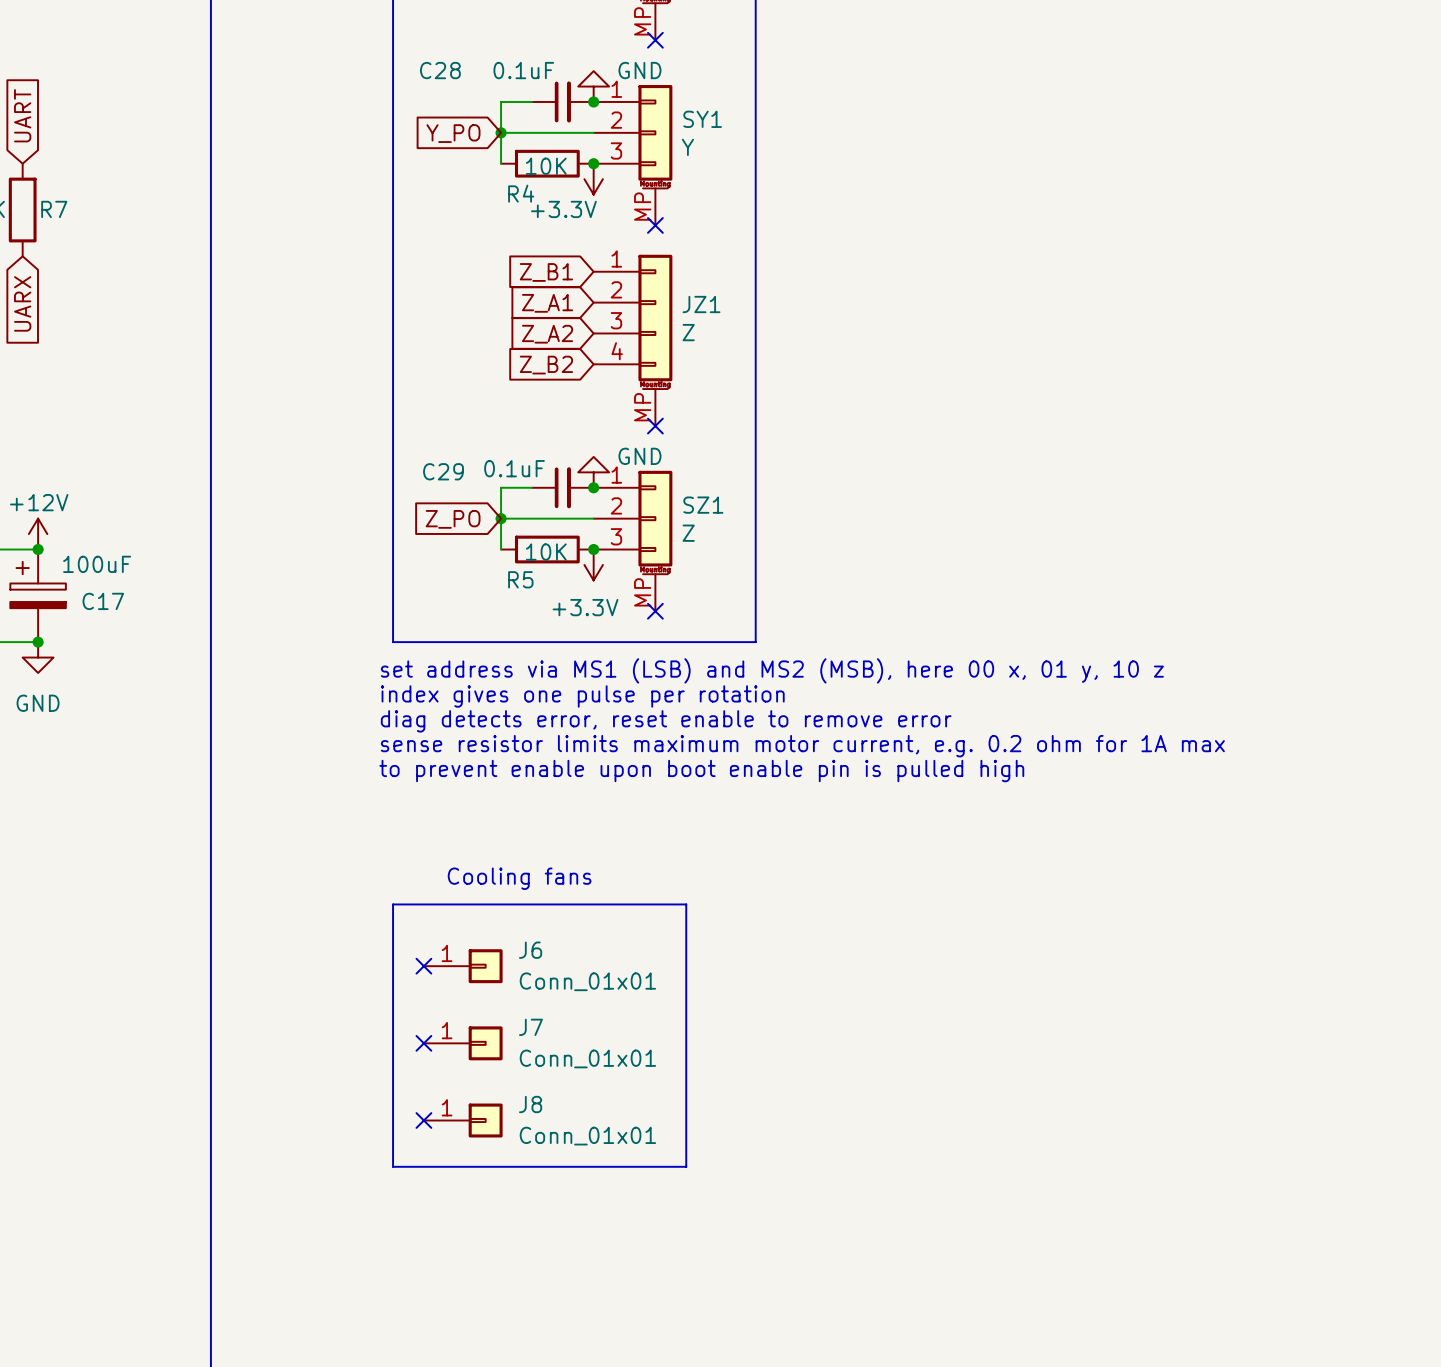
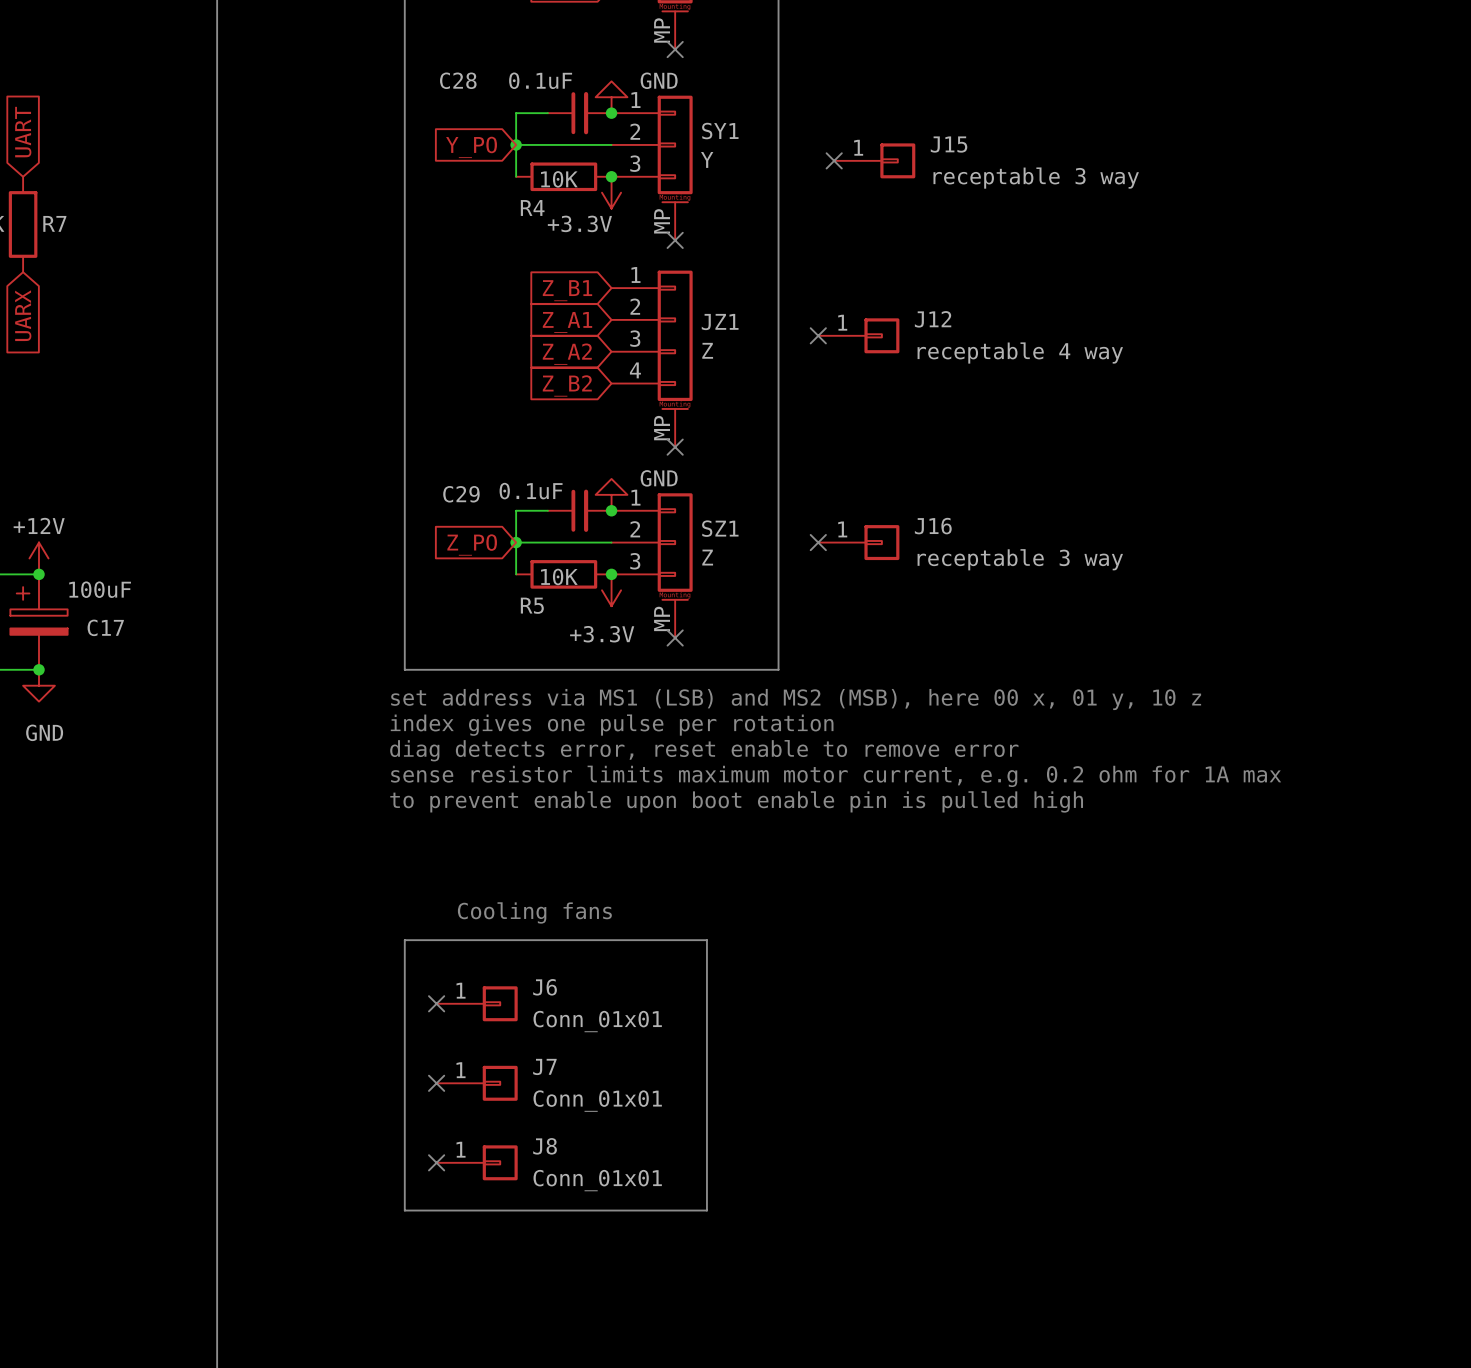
no-connect mark: none -> (834, 160)
J15: none -> receptable 3 way (874, 160)
no-connect mark: none -> (818, 335)
J12: none -> receptable 4 way (858, 335)
no-connect mark: none -> (818, 542)
J16: none -> receptable 3 way (858, 542)

